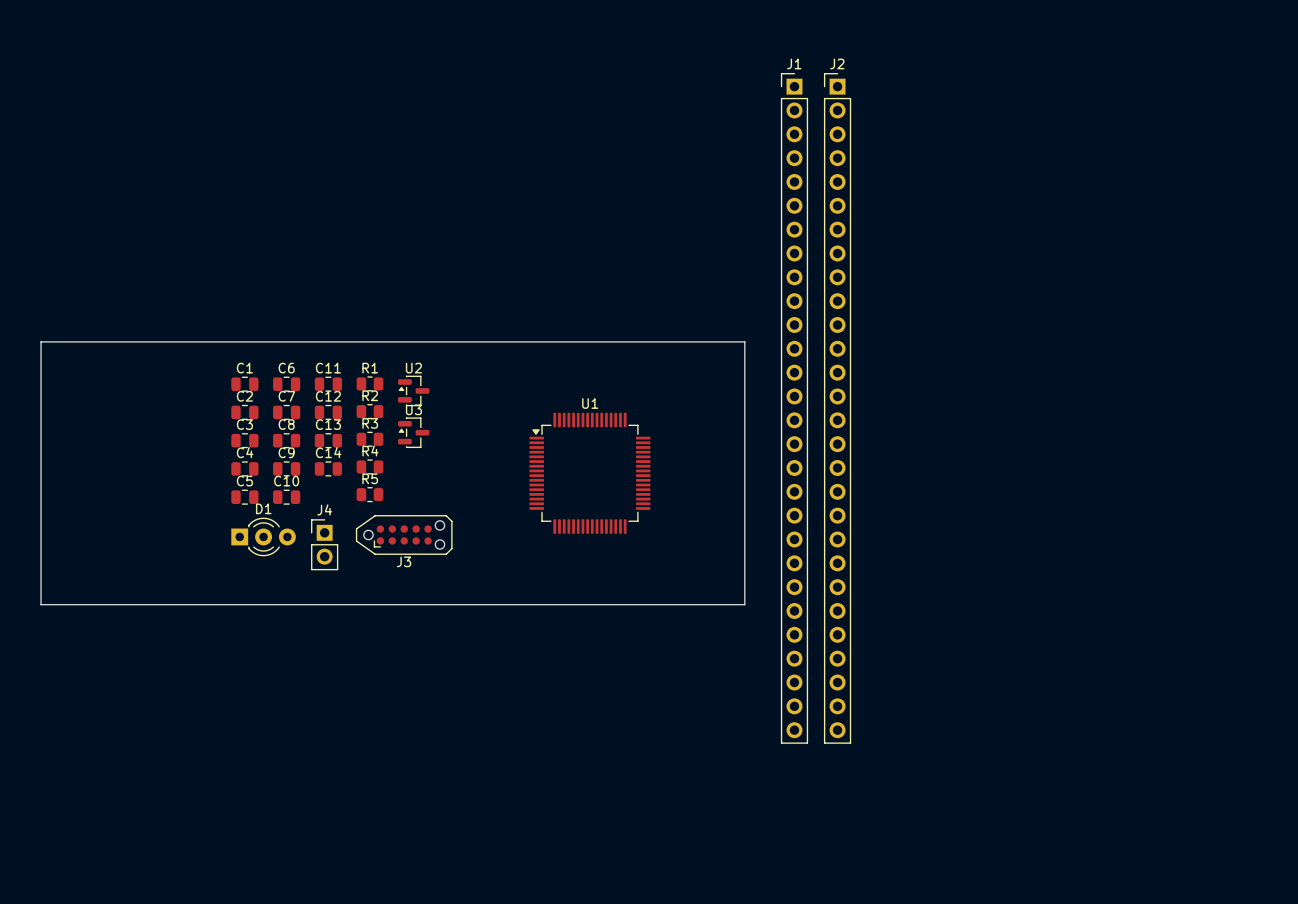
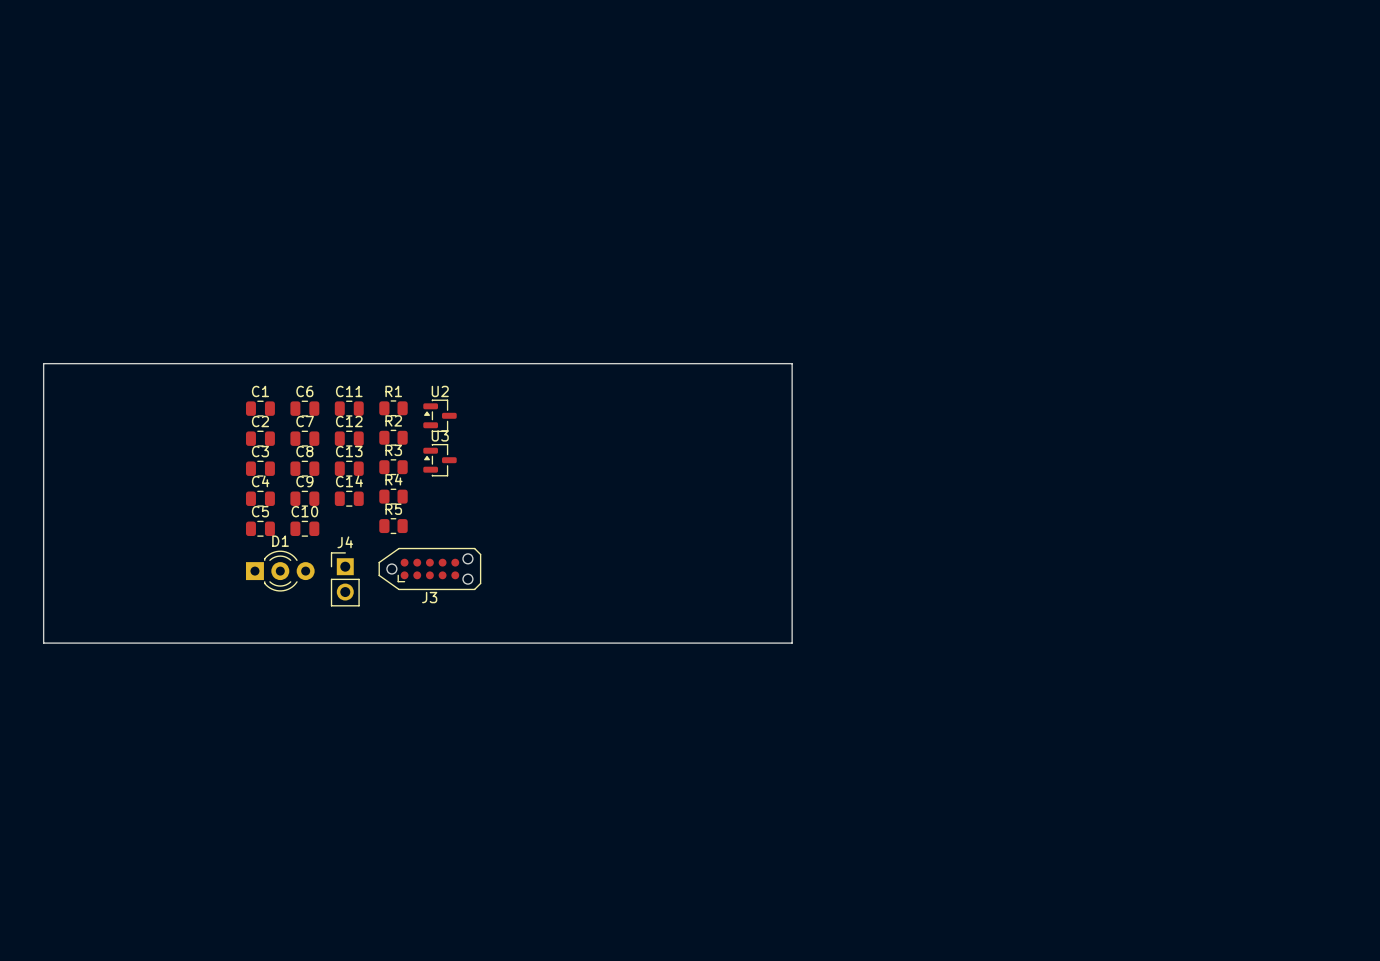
J1: (794, 408) -> none
J2: (837, 408) -> none
U1: (589, 473) -> none

